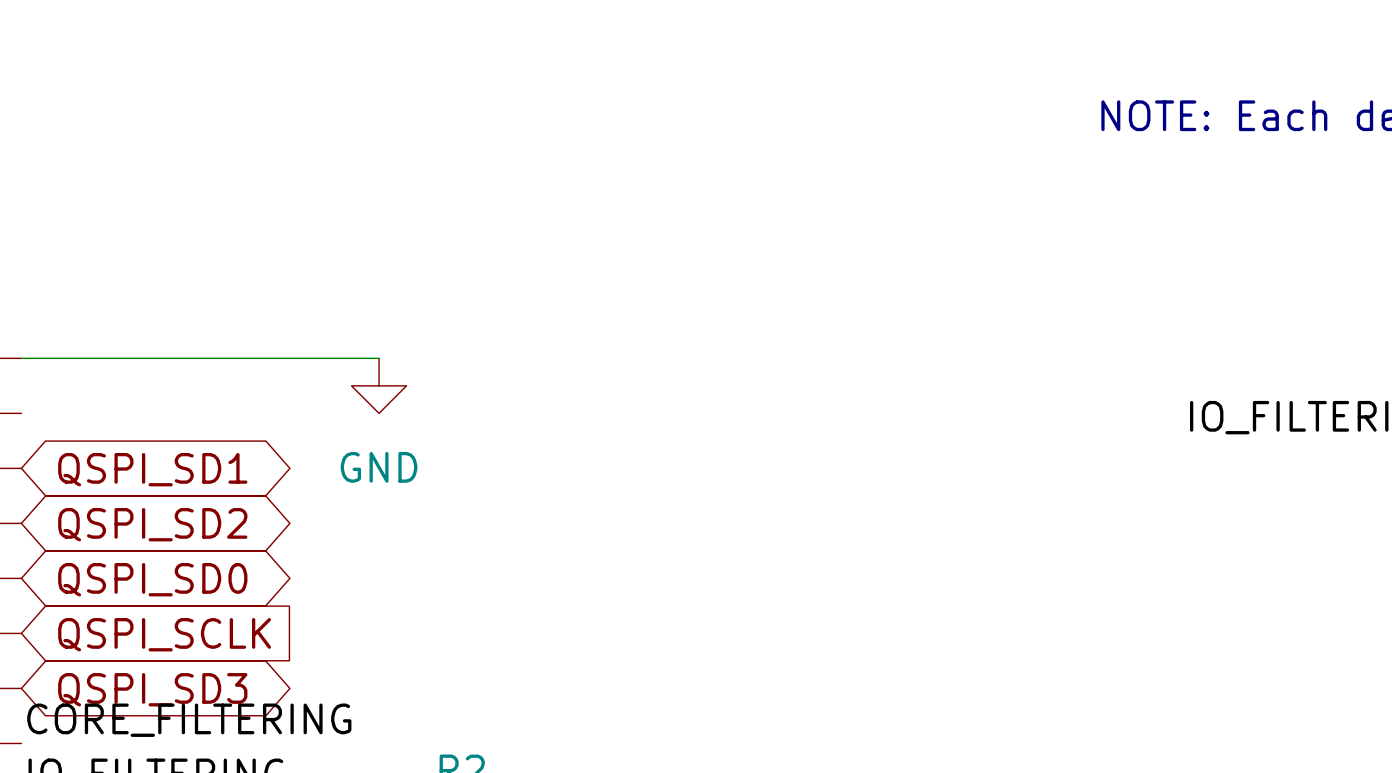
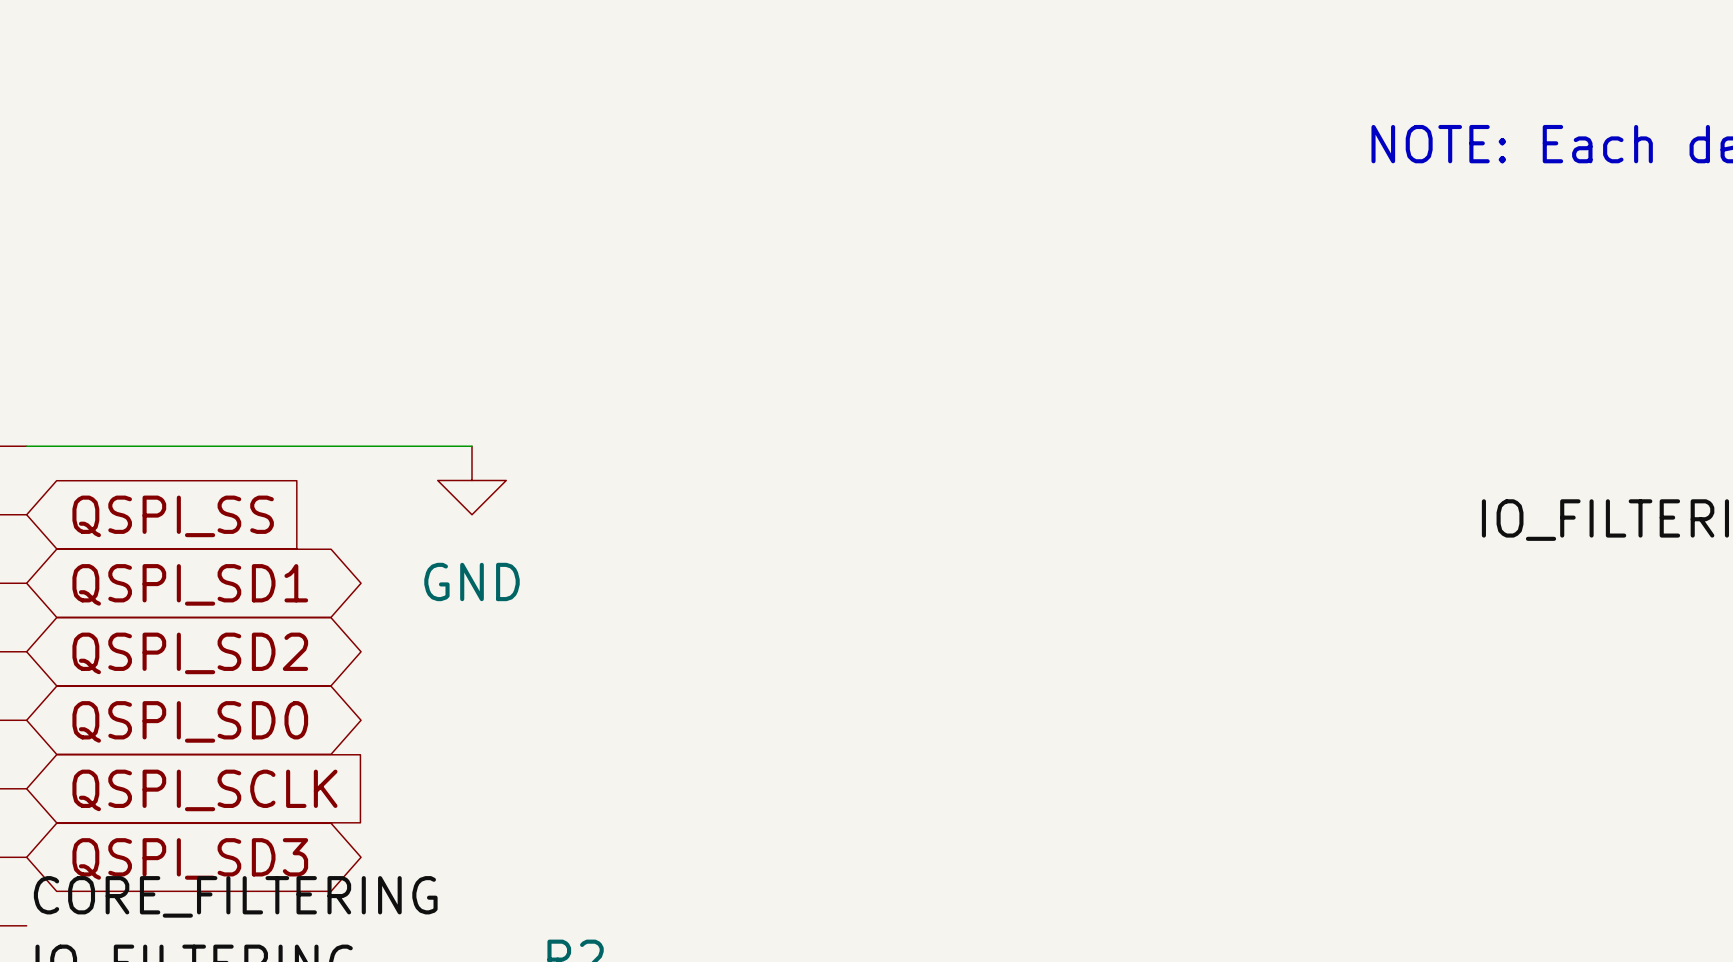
global label: none -> QSPI_SS (173, 516)

